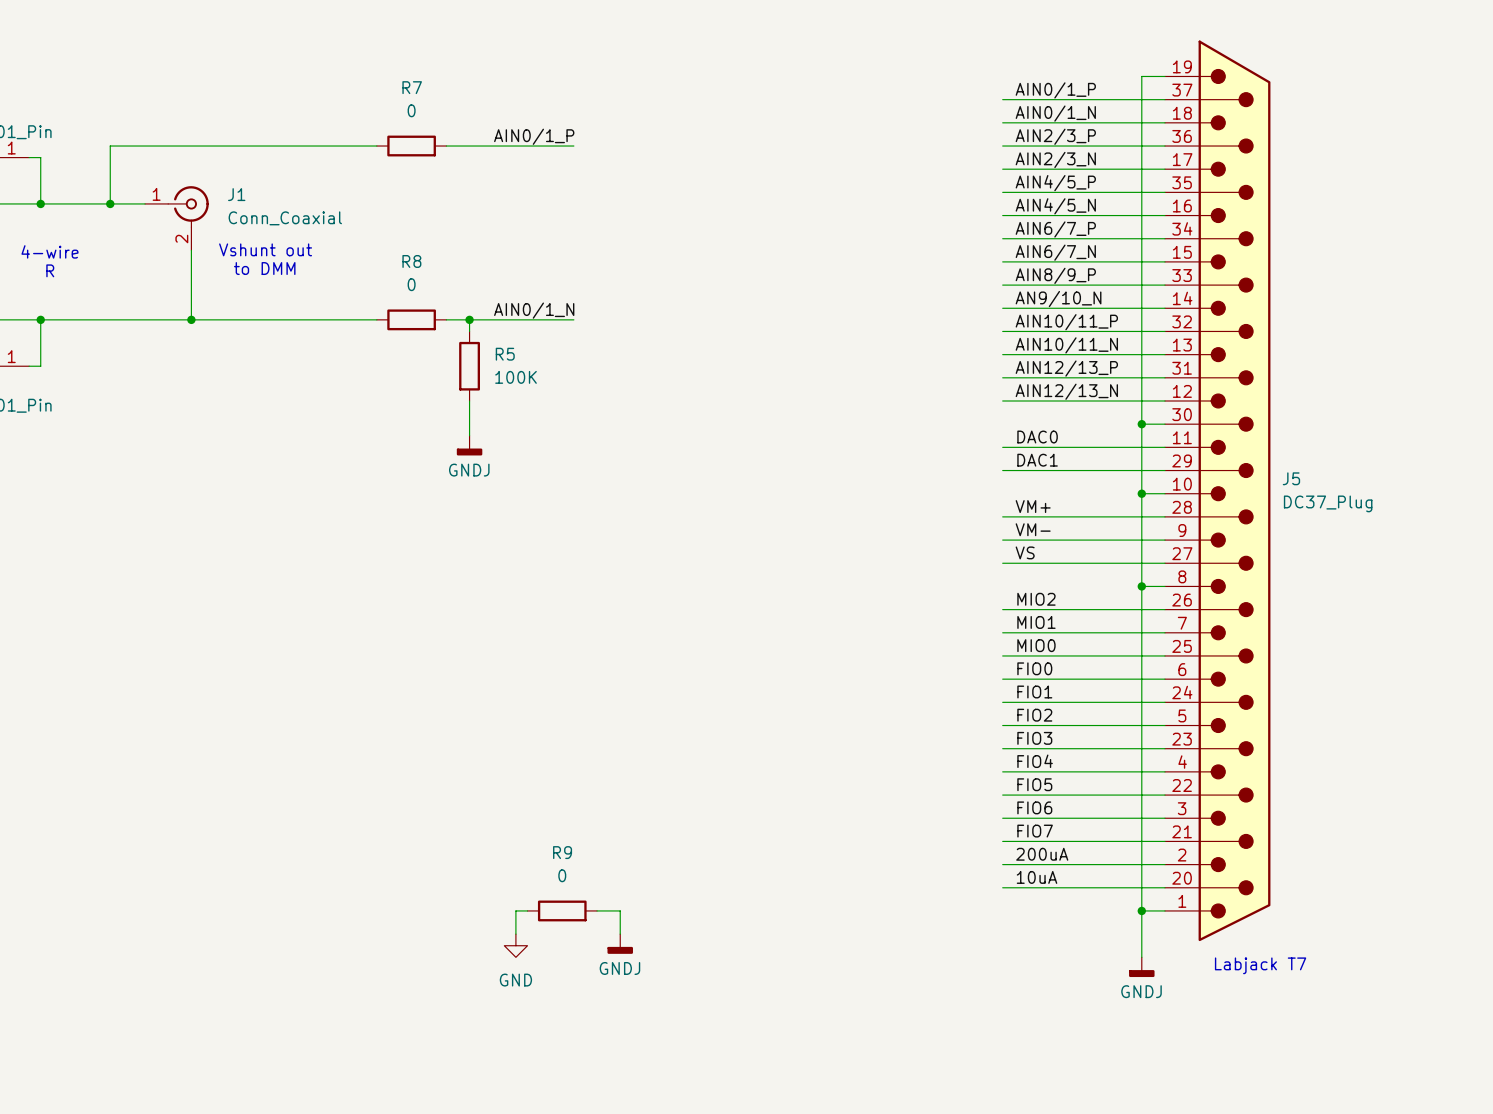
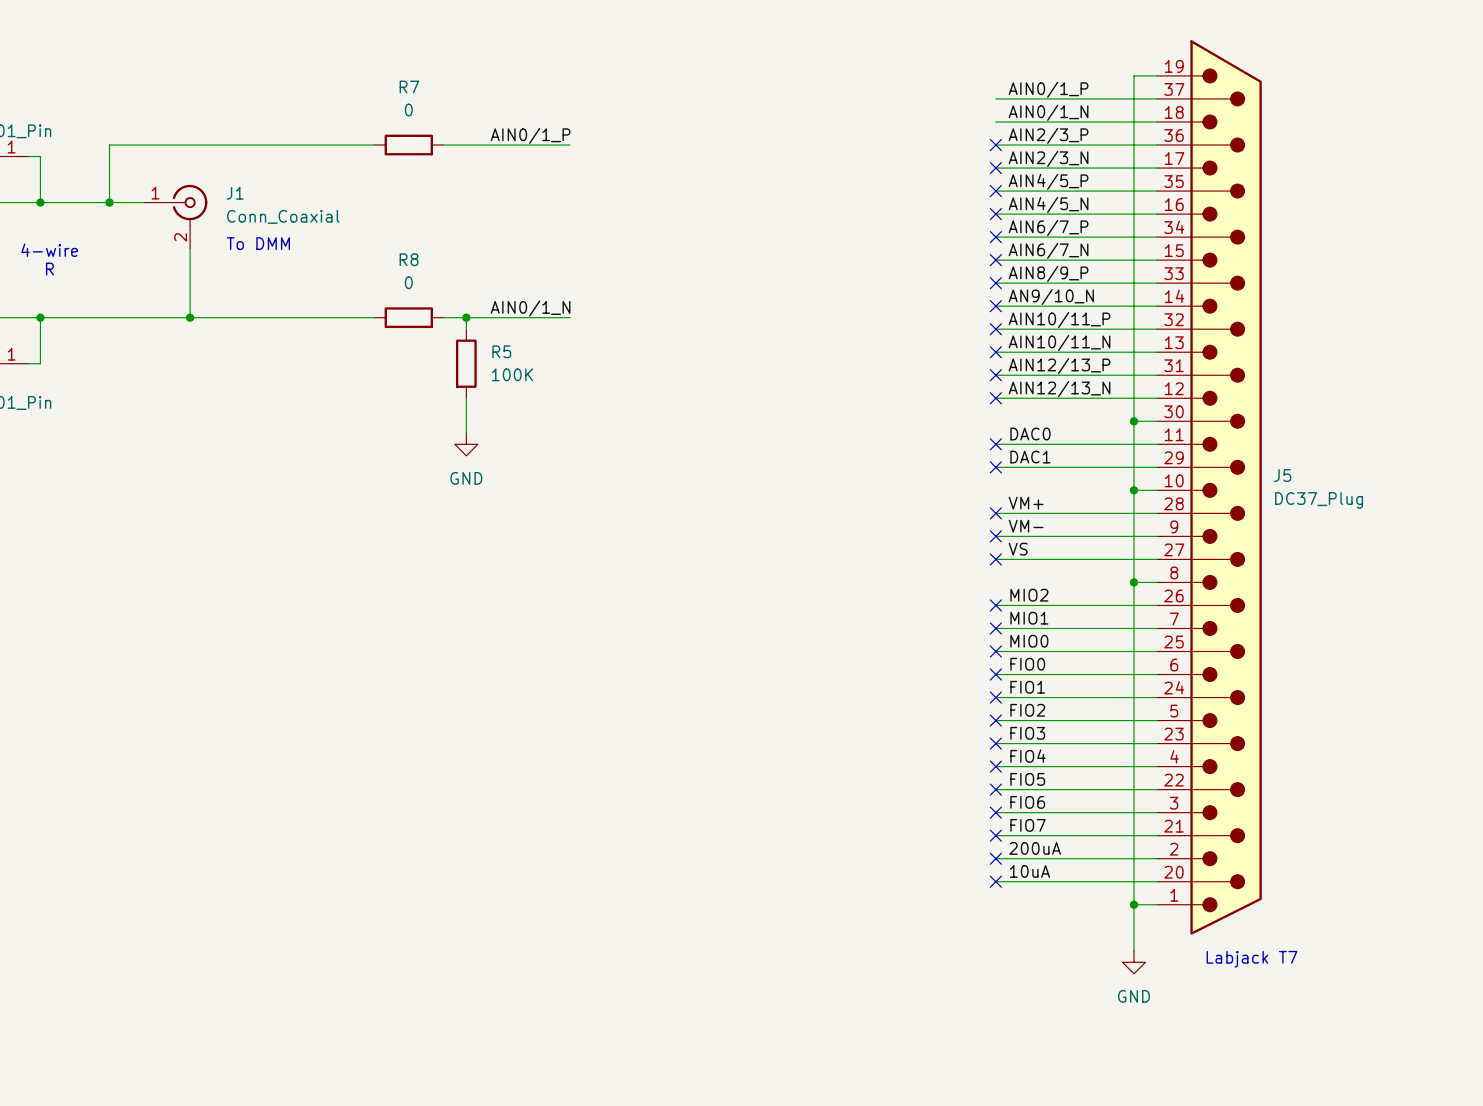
no-connect mark: none -> (995, 145)
no-connect mark: none -> (995, 168)
no-connect mark: none -> (995, 191)
no-connect mark: none -> (995, 214)
no-connect mark: none -> (995, 237)
text: Vshunt out (265, 249) -> To DMM (258, 243)
no-connect mark: none -> (995, 260)
text: to DMM (264, 268) -> none
no-connect mark: none -> (995, 283)
no-connect mark: none -> (995, 306)
no-connect mark: none -> (995, 329)
no-connect mark: none -> (995, 352)
no-connect mark: none -> (995, 375)
no-connect mark: none -> (995, 398)
power symbol: GNDJ (469, 445) -> GND (466, 444)
no-connect mark: none -> (995, 444)
no-connect mark: none -> (995, 467)
no-connect mark: none -> (995, 513)
no-connect mark: none -> (995, 536)
no-connect mark: none -> (995, 559)
no-connect mark: none -> (995, 605)
no-connect mark: none -> (995, 628)
no-connect mark: none -> (995, 651)
no-connect mark: none -> (995, 674)
no-connect mark: none -> (995, 697)
no-connect mark: none -> (995, 720)
no-connect mark: none -> (995, 743)
no-connect mark: none -> (995, 766)
no-connect mark: none -> (995, 789)
no-connect mark: none -> (995, 812)
no-connect mark: none -> (995, 835)
no-connect mark: none -> (995, 858)
no-connect mark: none -> (995, 881)
wire: (527, 910) (515, 910) (515, 934) -> none
R9: 0 (562, 910) -> none
wire: (597, 910) (620, 910) (620, 934) -> none
power symbol: GNDJ (620, 943) -> none
power symbol: GND (515, 945) -> none
power symbol: GNDJ (1141, 967) -> GND (1133, 962)

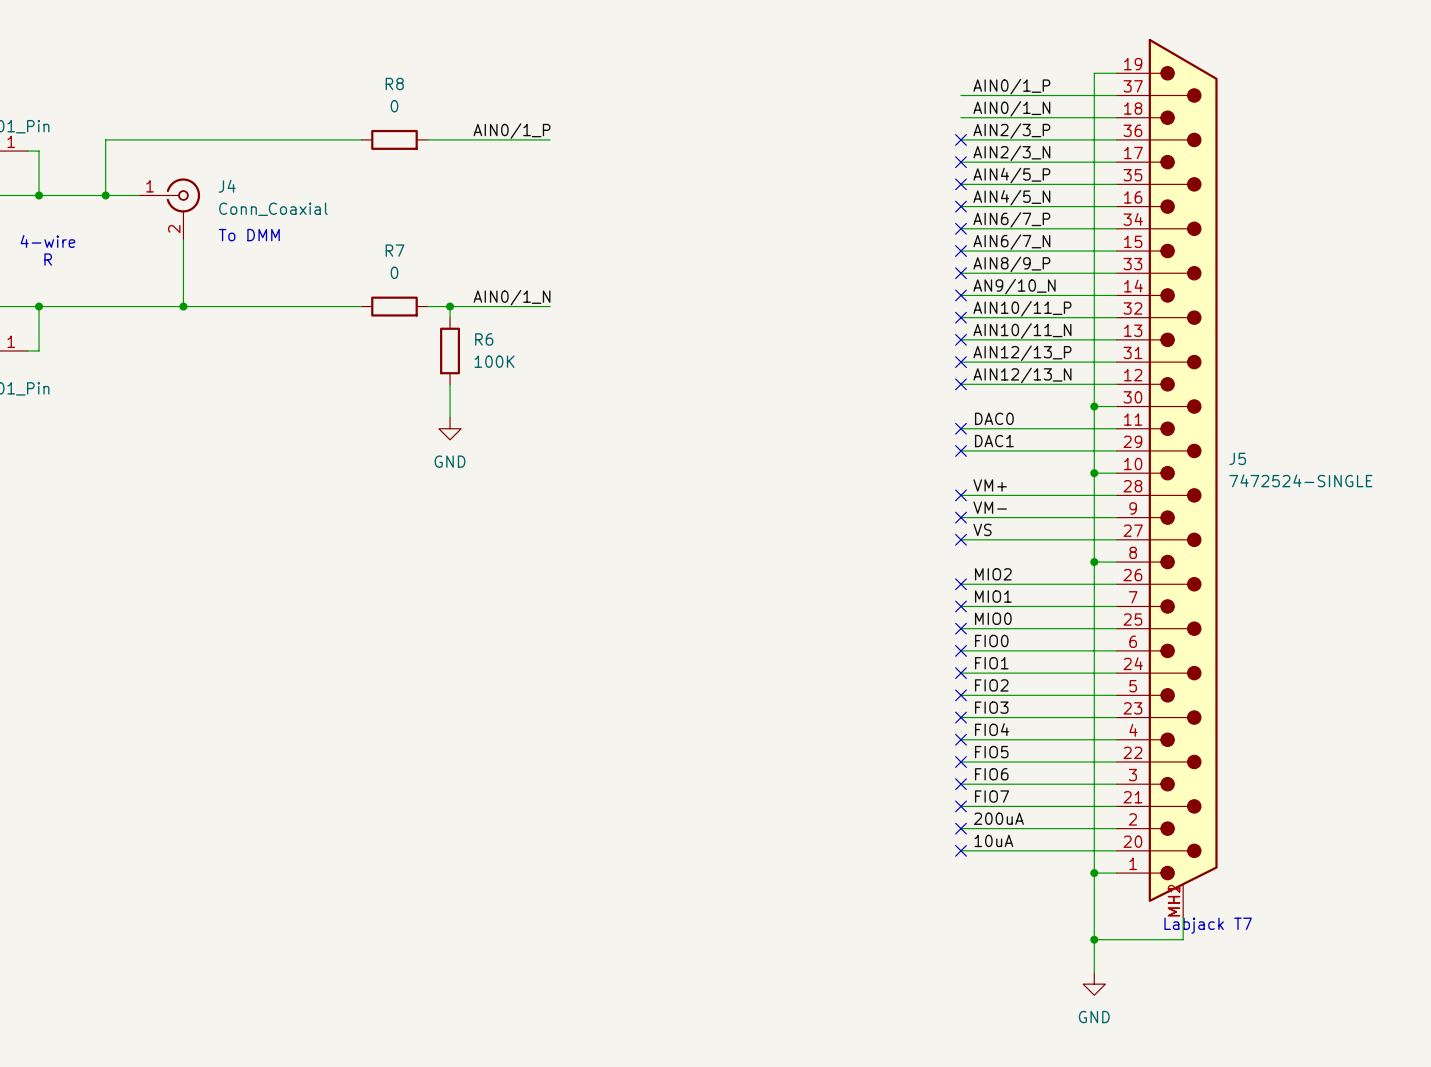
J5 symbol: [1157, 40, 1262, 935] -> [1116, 38, 1218, 918]
R7 name: R7 (409, 87) -> R8 (394, 83)
J1 name: J1 (235, 193) -> J4 (227, 186)
R8 name: R8 (409, 259) -> R7 (395, 250)
R5 name: R5 (501, 351) -> R6 (484, 339)
J5 value: DC37_Plug (1319, 500) -> 7472524-SINGLE (1300, 480)
wire: none -> (1094, 917) (1094, 973)
wire: none -> (1183, 917) (1183, 939) (1094, 939)
power symbol position: GND (1133, 962) -> GND (1094, 984)
junction: none -> (1094, 939)

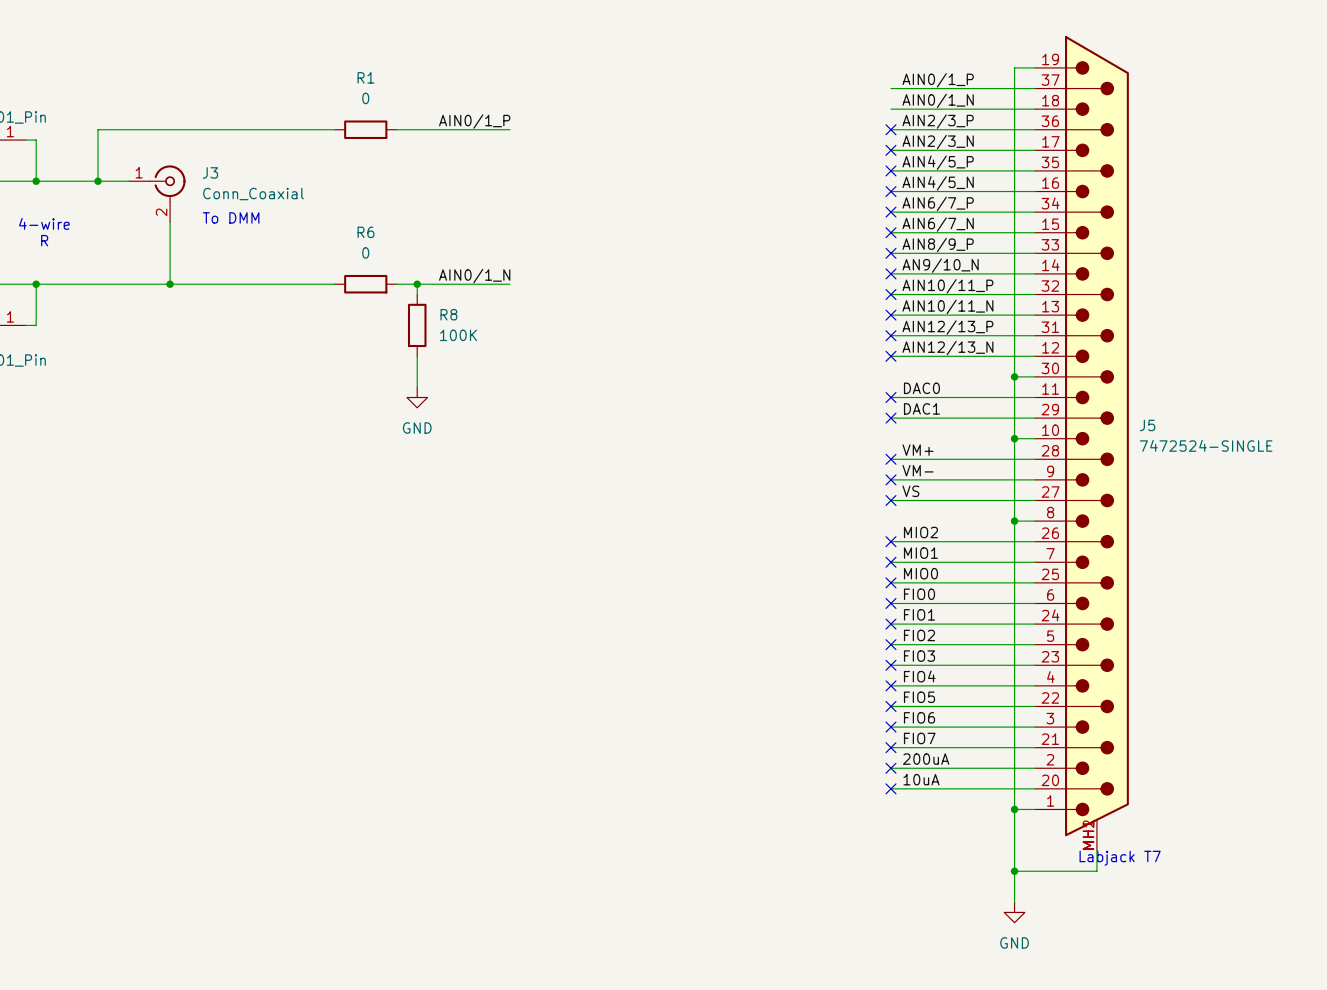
R8 name: R8 (394, 83) -> R1 (365, 77)
J4 name: J4 (227, 186) -> J3 (210, 172)
R7 name: R7 (395, 250) -> R6 (365, 232)
R6 name: R6 (484, 339) -> R8 (448, 314)

